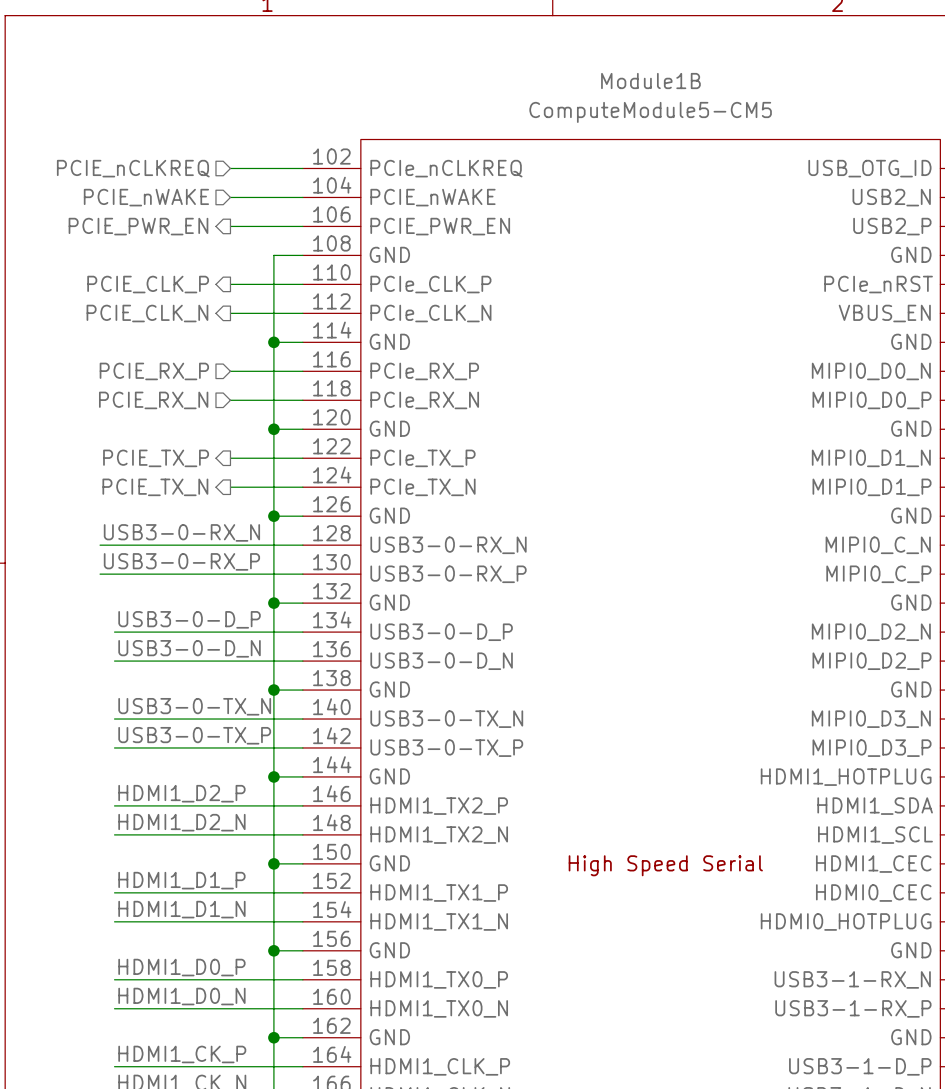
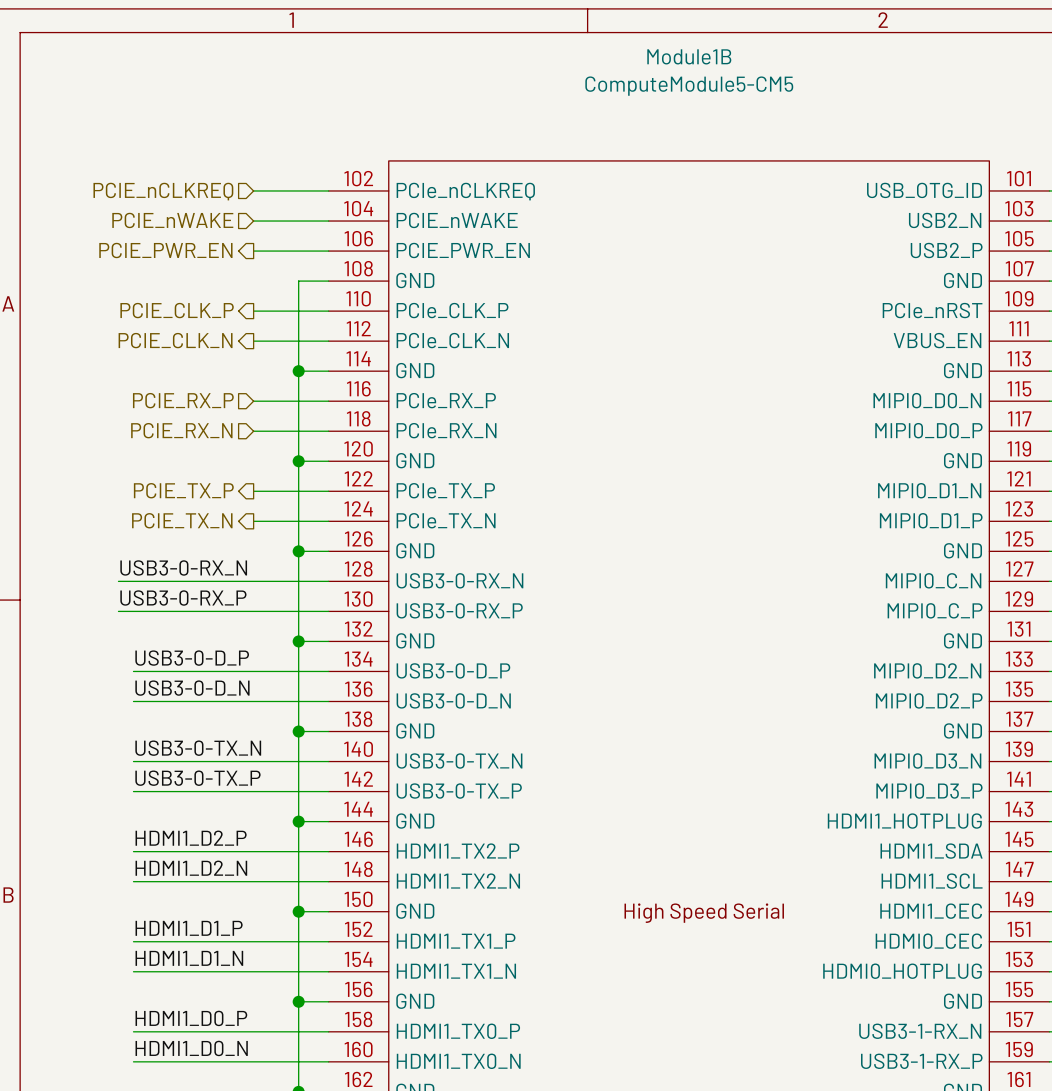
Module1B name position: Module1B (650, 81) -> Module1B (689, 56)
Module1B value position: ComputeModule5-CM5 (650, 112) -> ComputeModule5-CM5 (689, 86)

